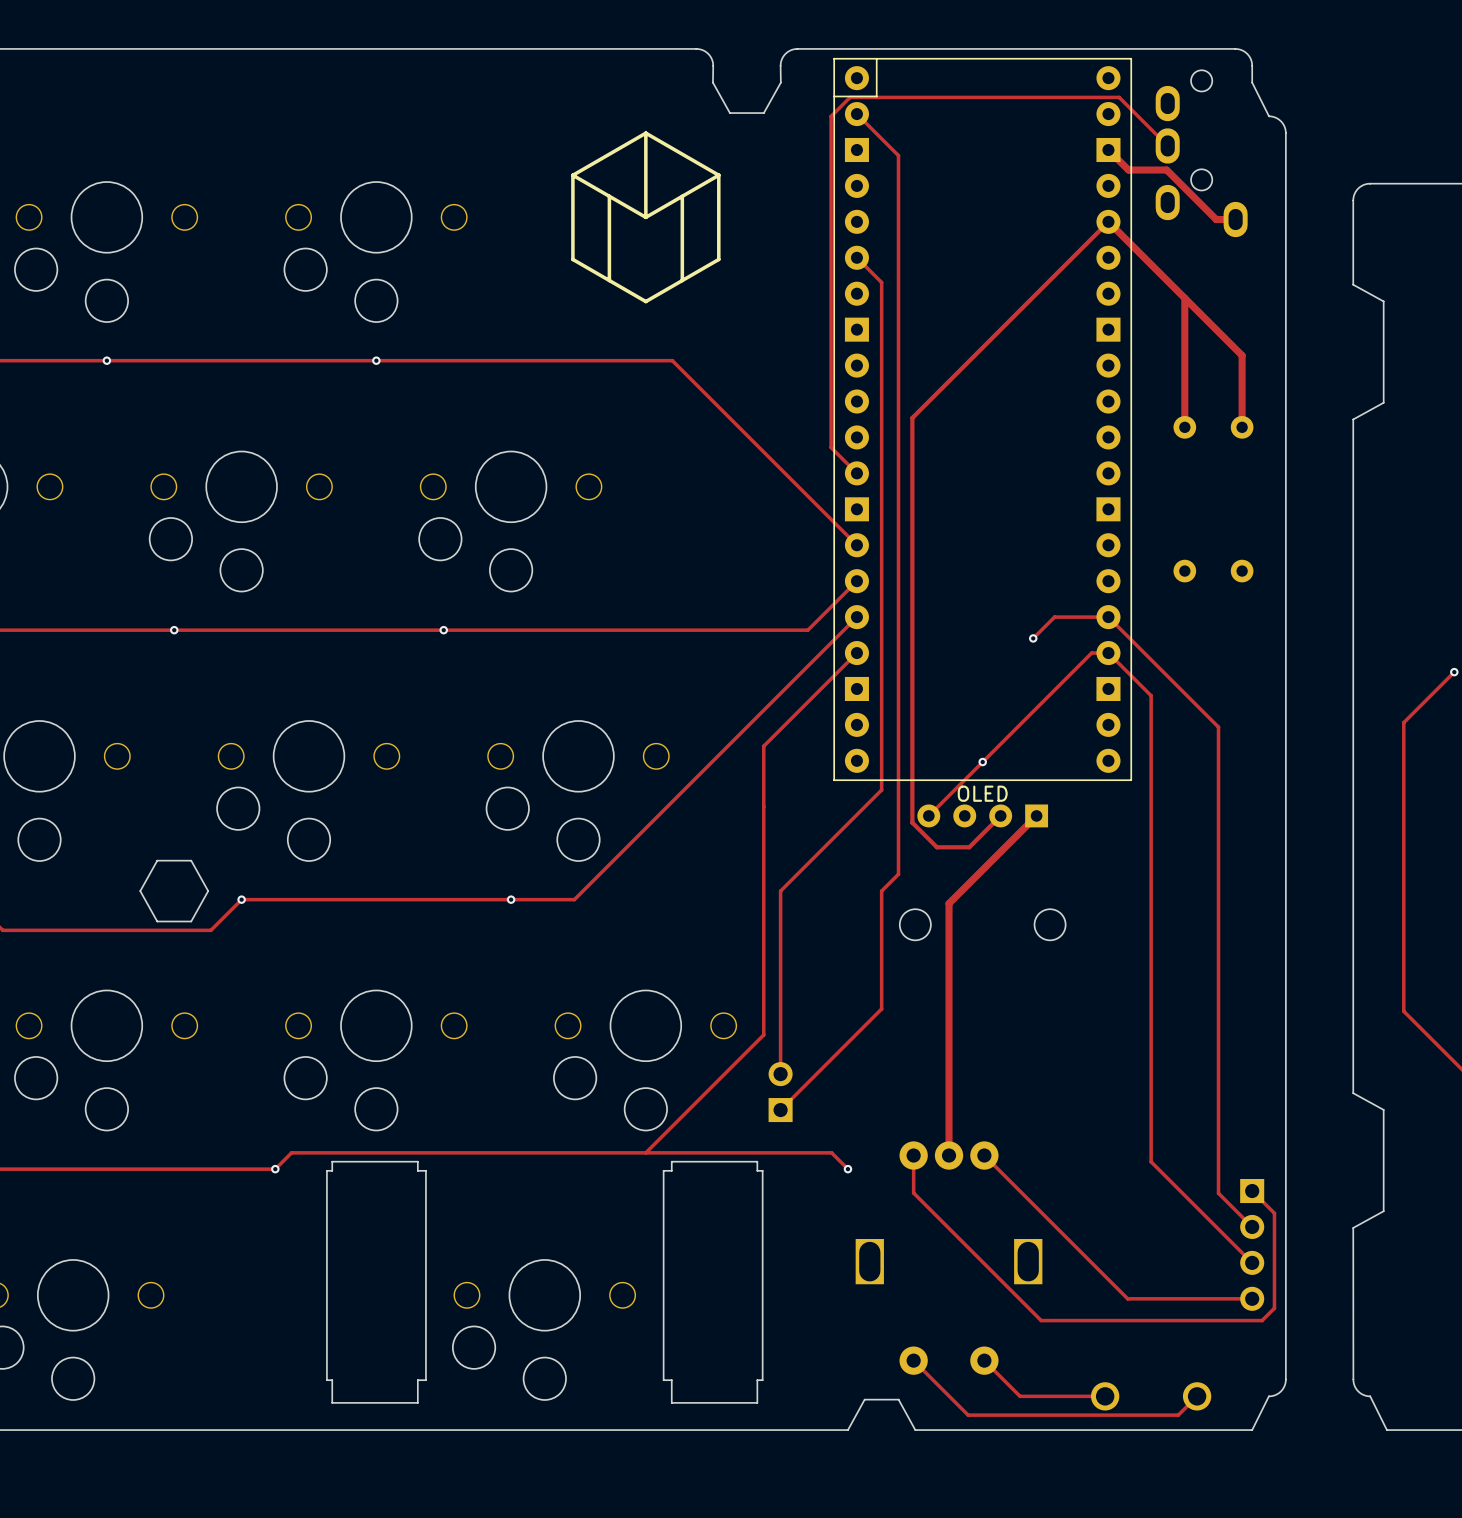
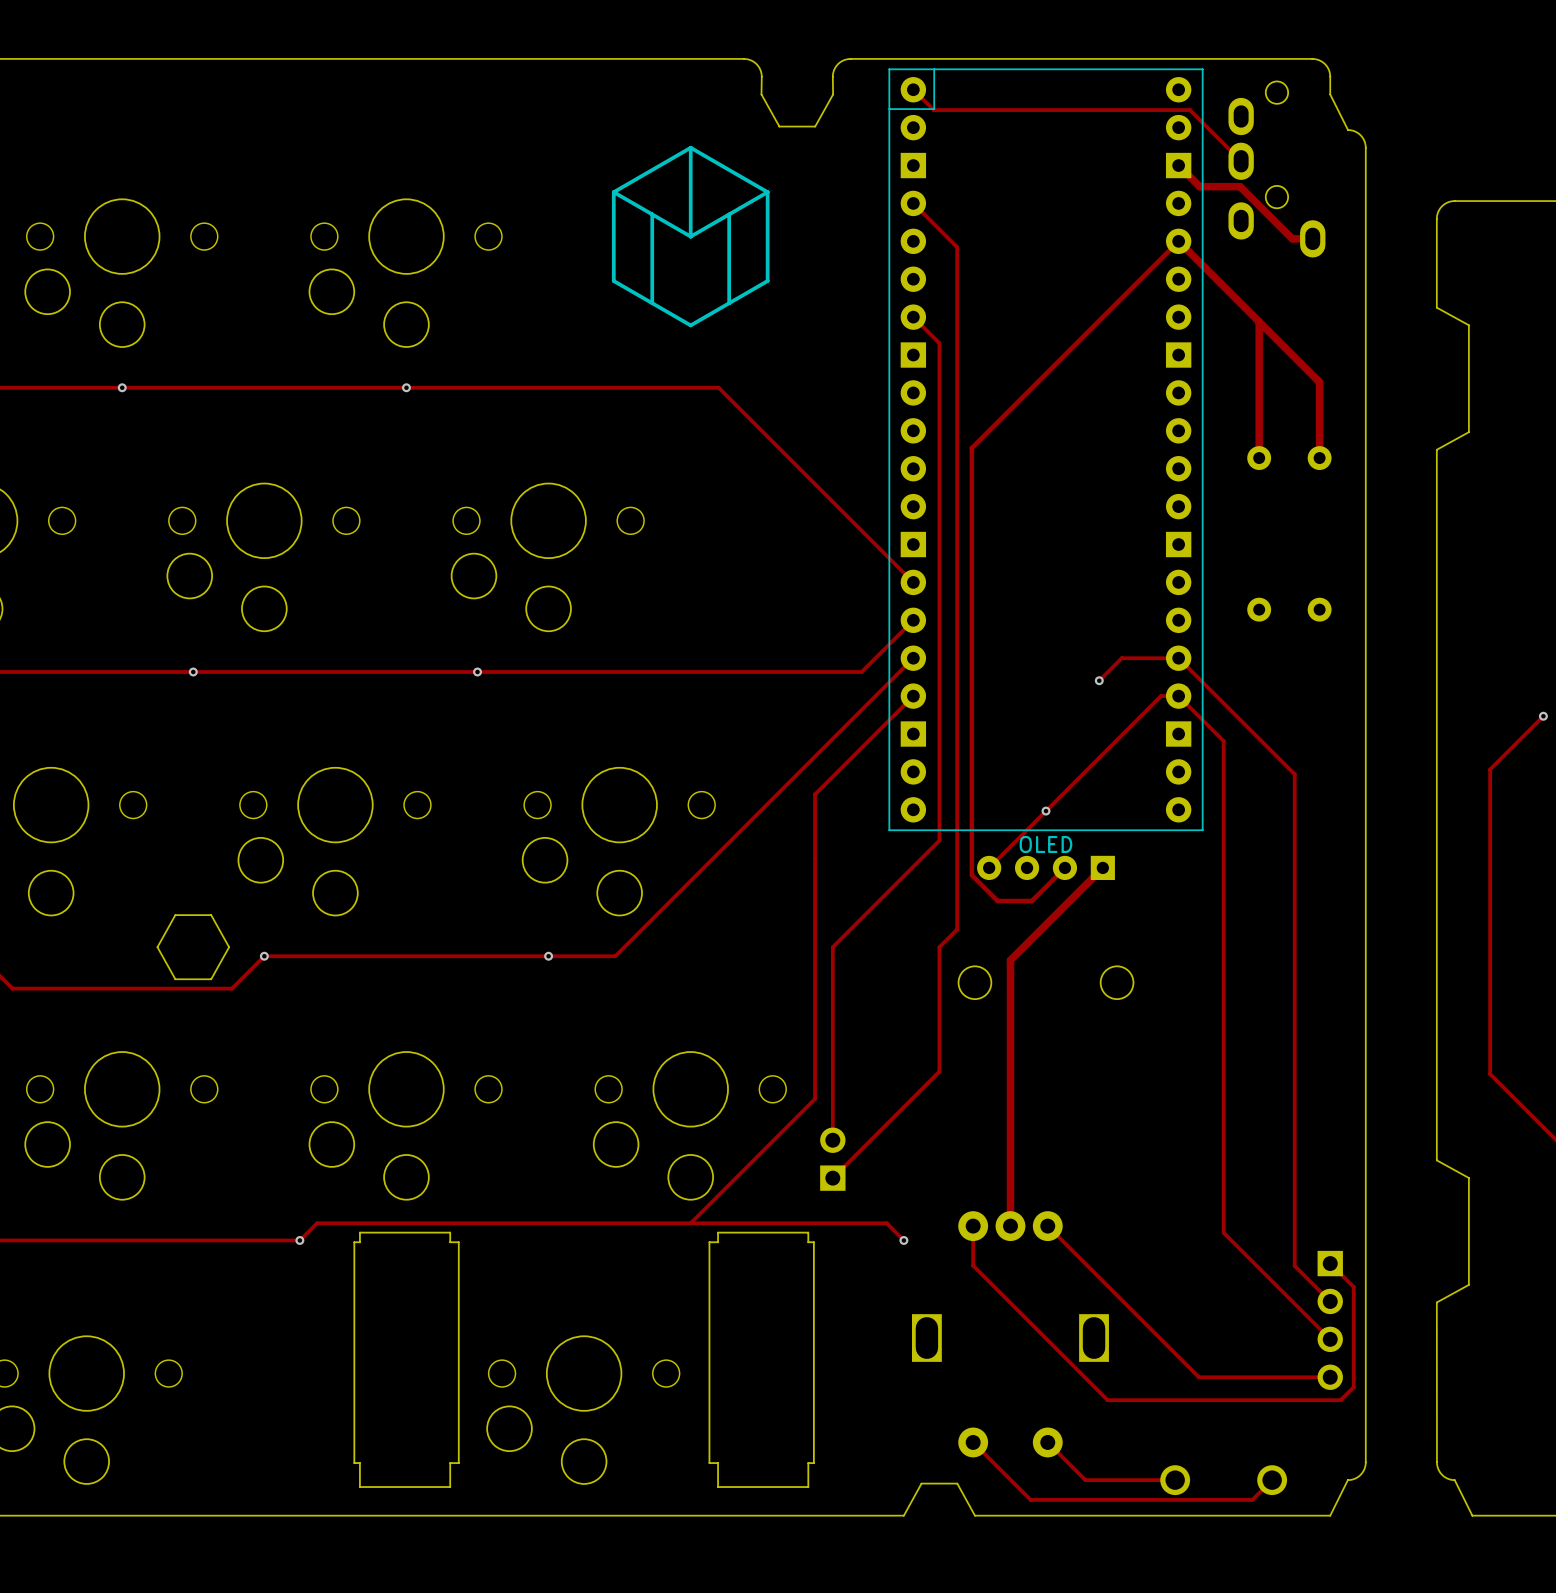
track: (876, 97) (850, 97) (831, 116) (831, 447) (856, 473) -> (933, 110) (913, 89)
track: (856, 114) (898, 155) (898, 227) -> (913, 203) (957, 247)
track: (856, 257) (881, 282) (881, 318) -> (913, 317) (939, 343)

